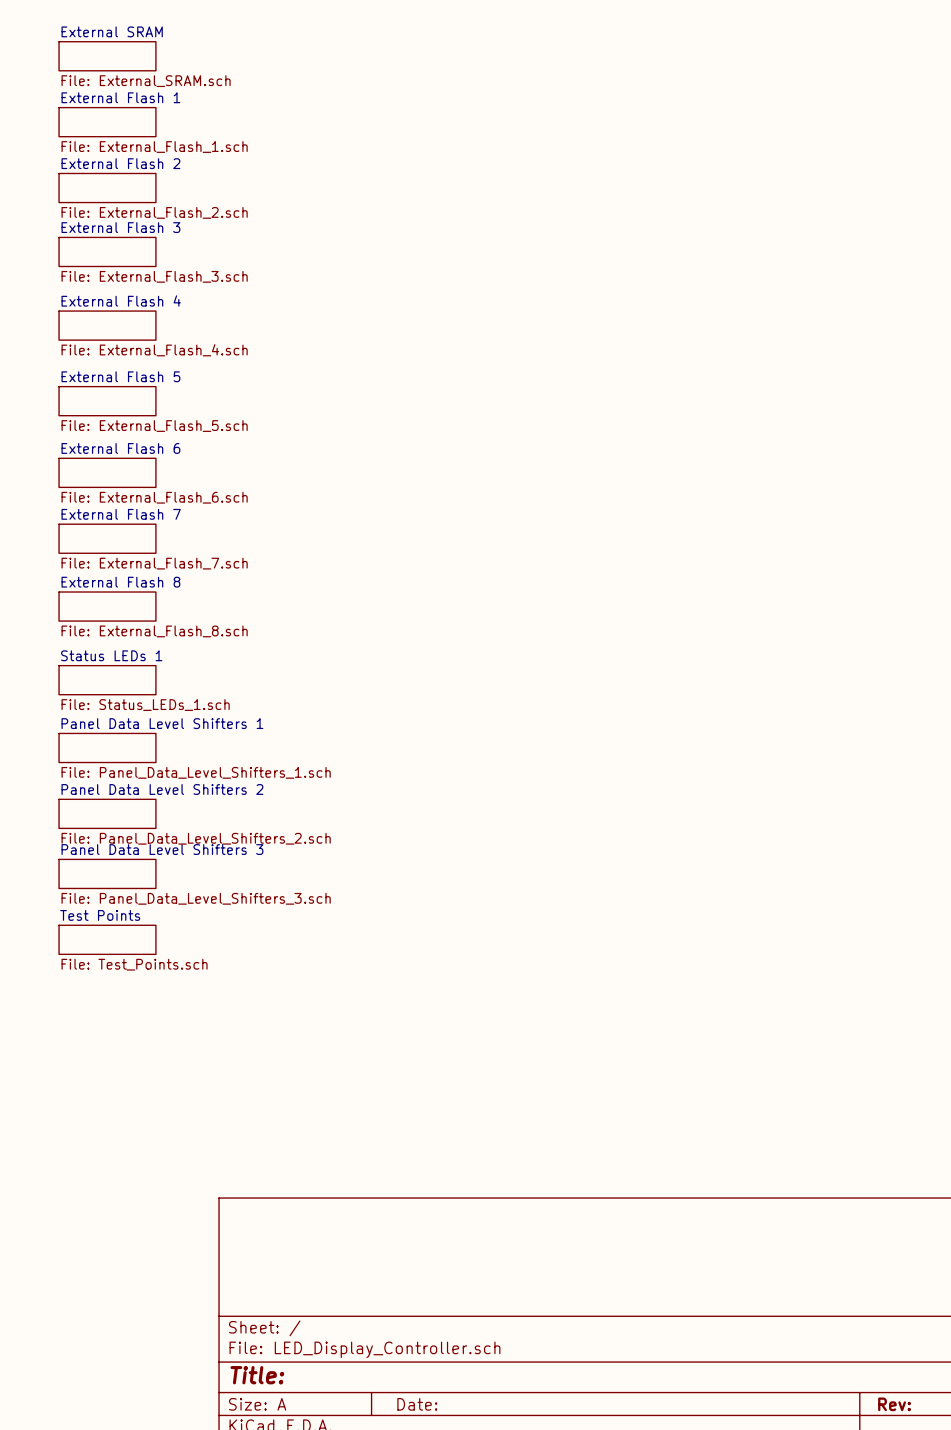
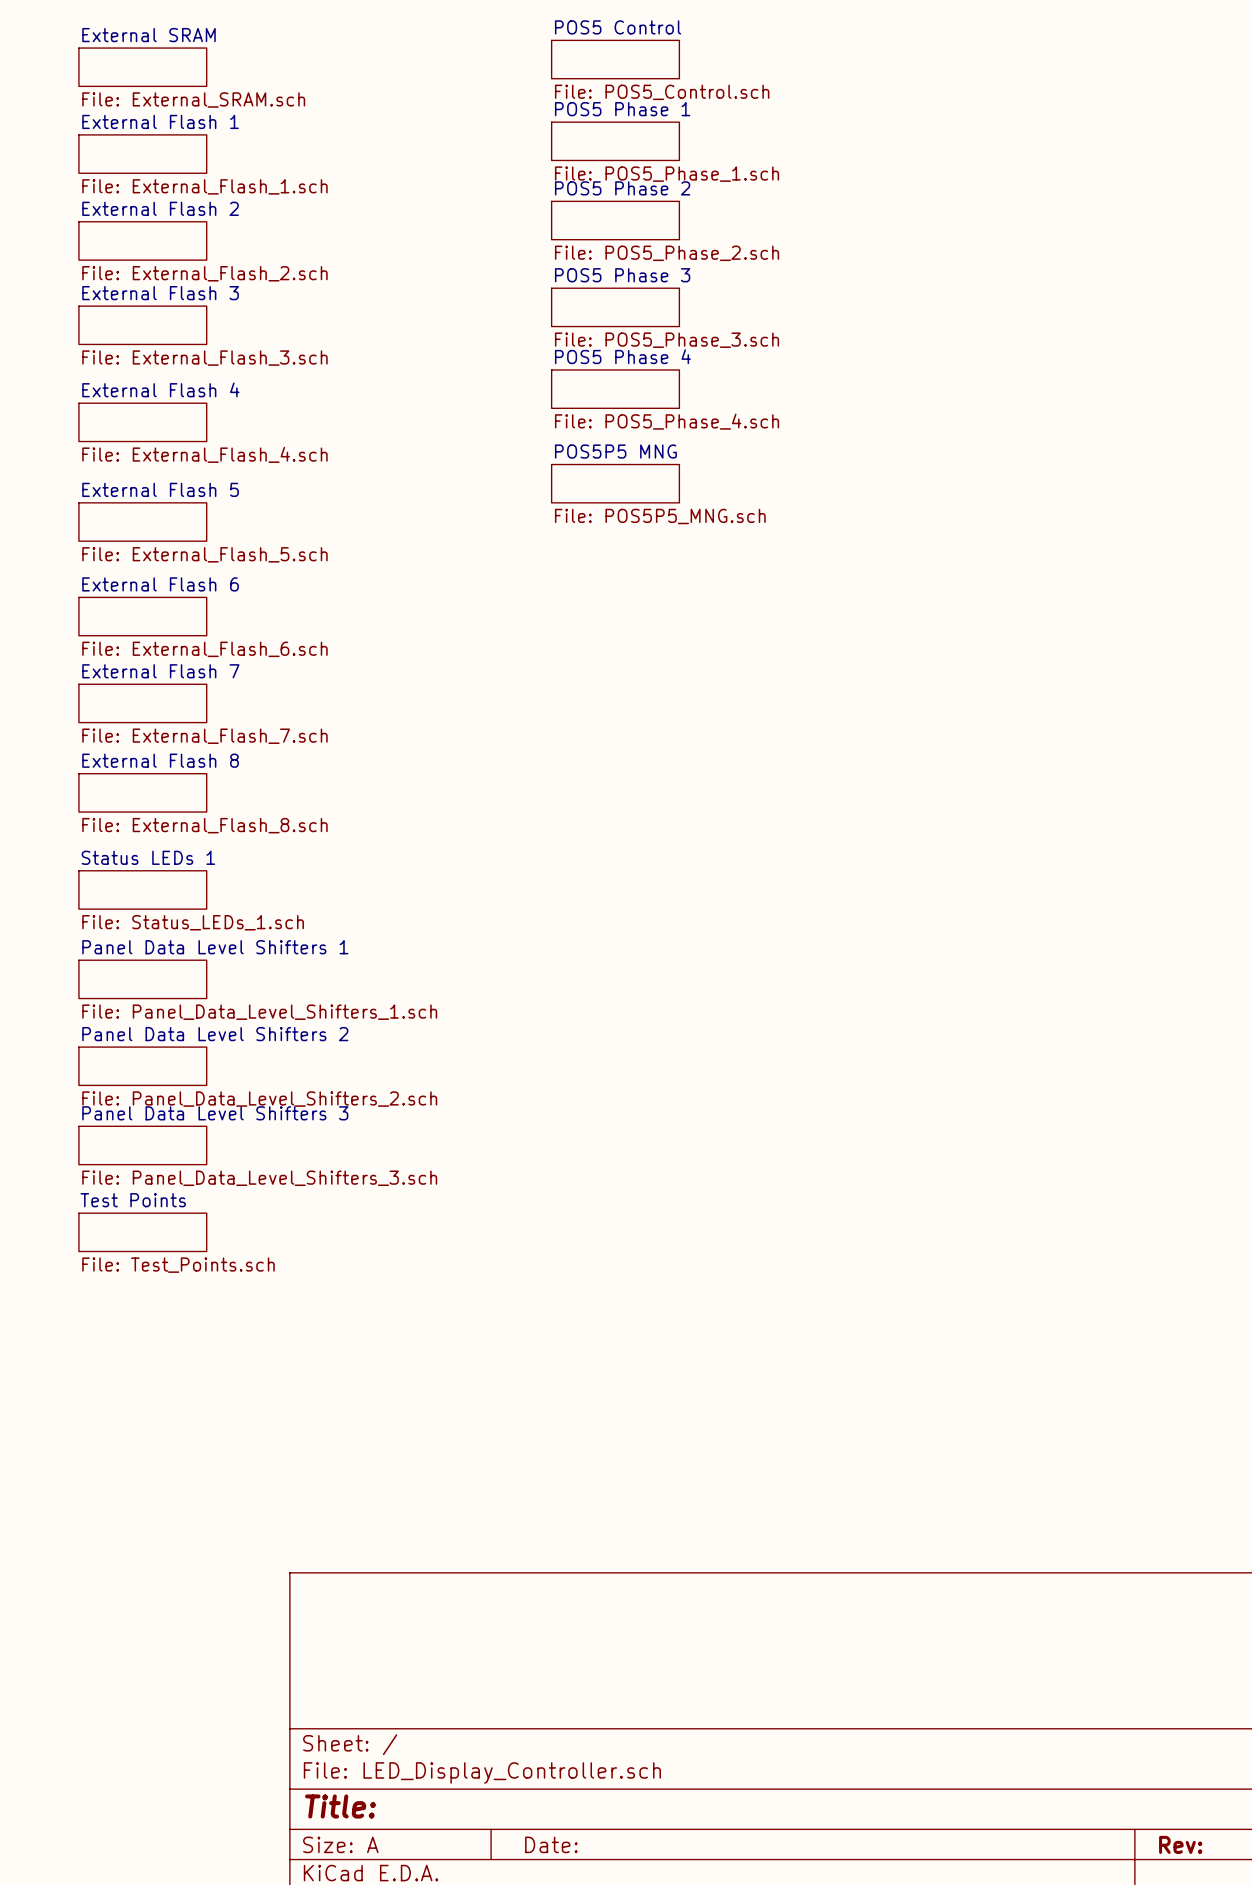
sheet POS5 Control: none -> File: POS5_Control.sch (615, 59)
sheet POS5 Phase 1: none -> File: POS5_Phase_1.sch (615, 141)
sheet POS5 Phase 2: none -> File: POS5_Phase_2.sch (615, 220)
sheet POS5 Phase 3: none -> File: POS5_Phase_3.sch (615, 307)
sheet POS5 Phase 4: none -> File: POS5_Phase_4.sch (615, 389)
sheet POS5P5 MNG: none -> File: POS5P5_MNG.sch (615, 483)

